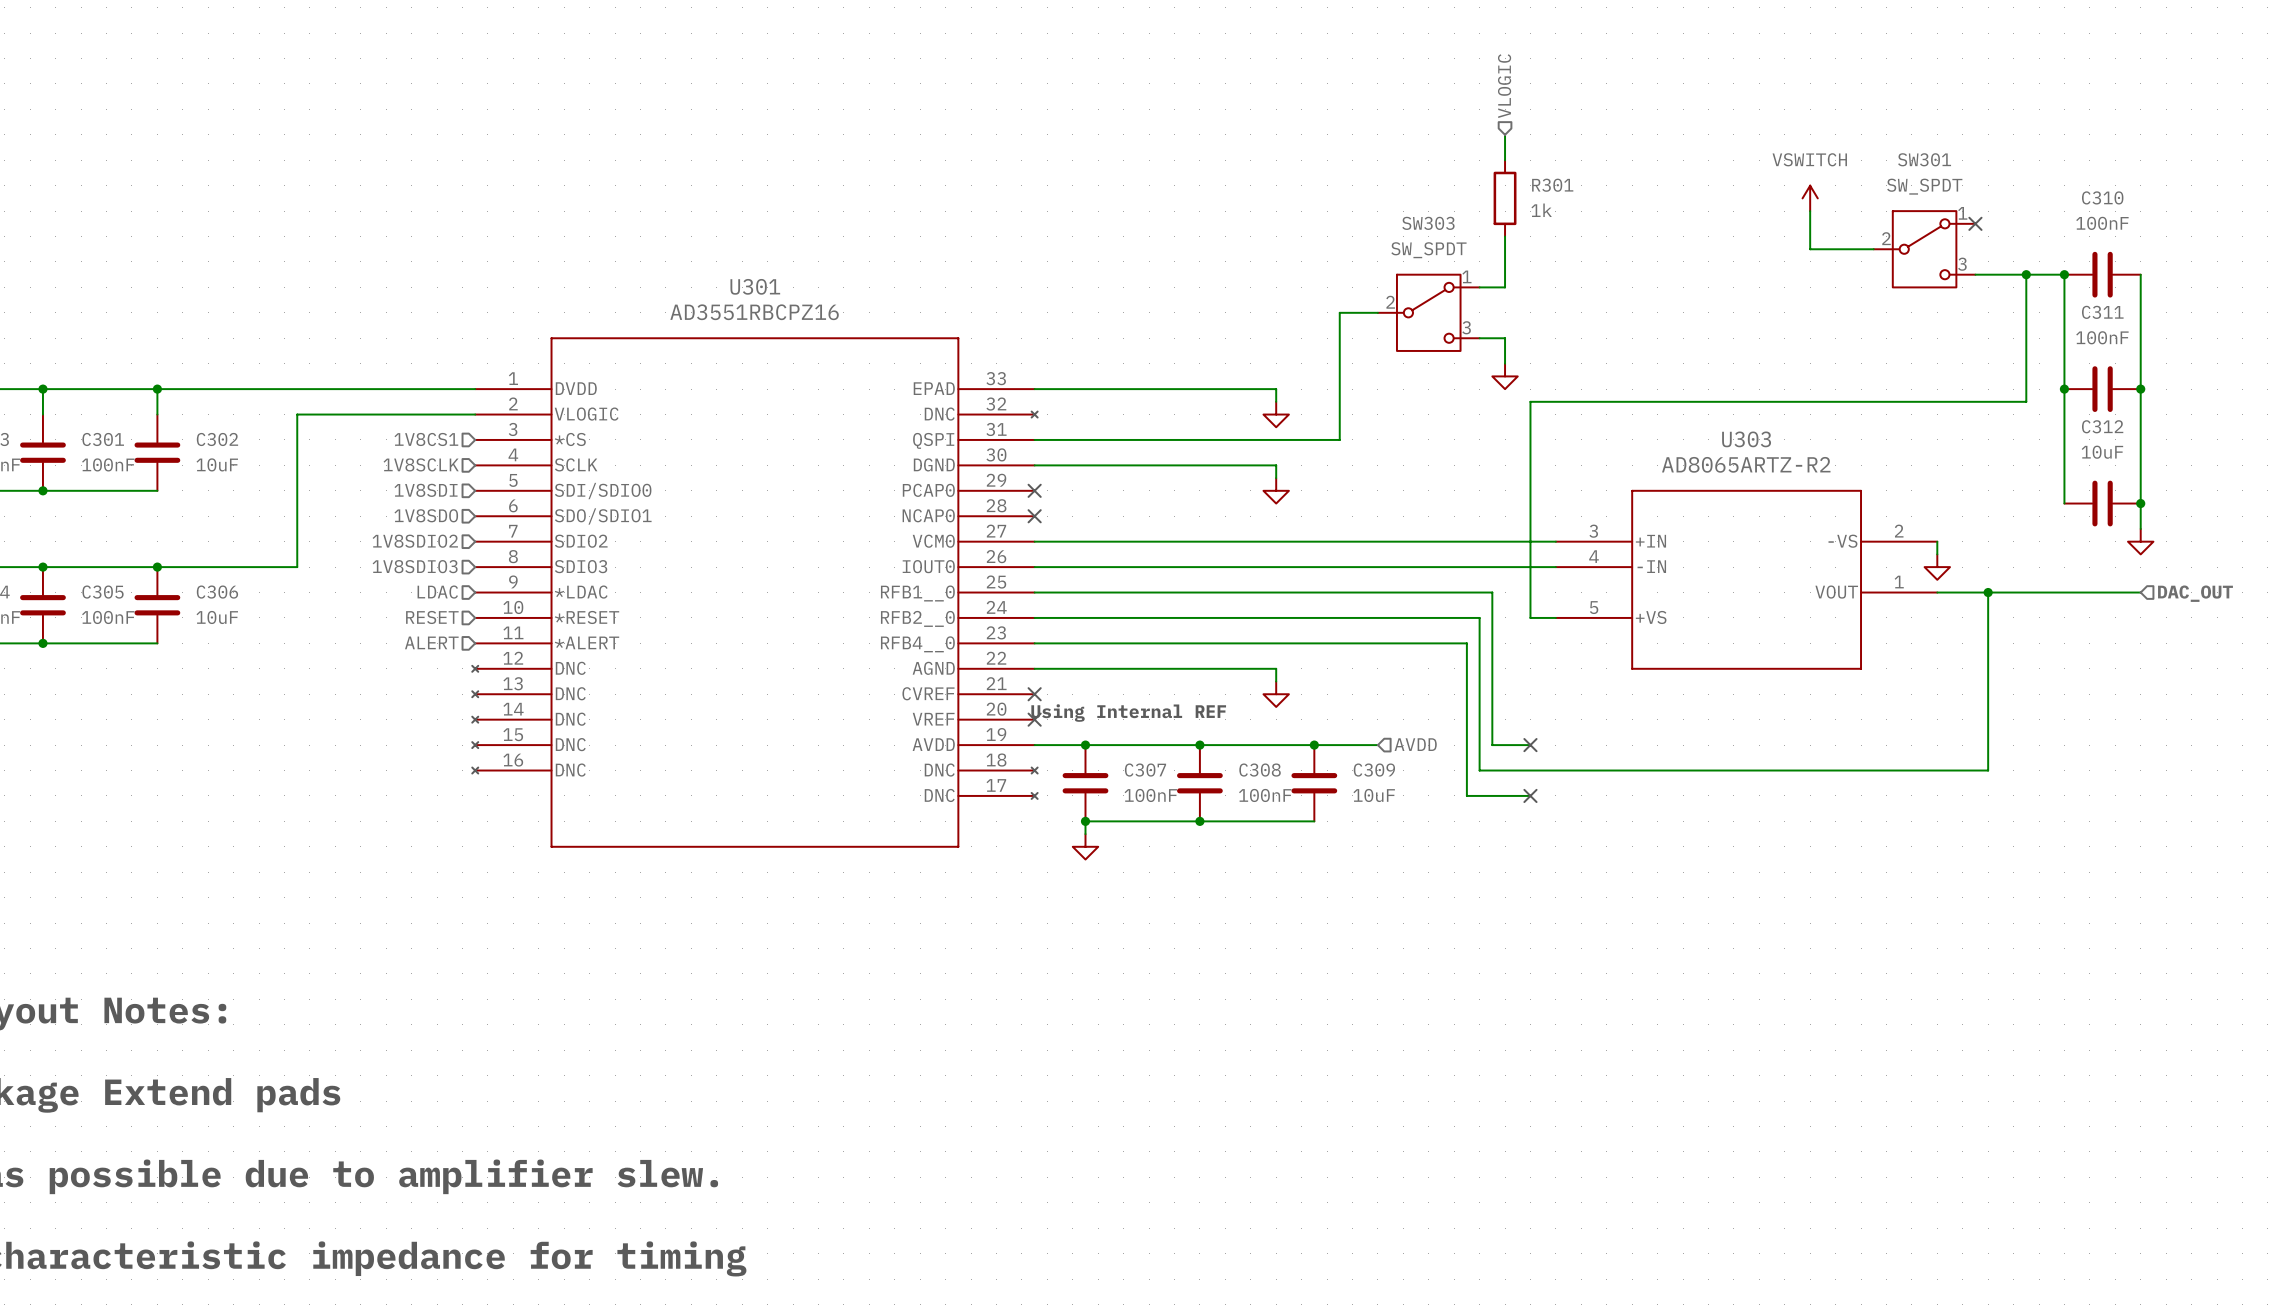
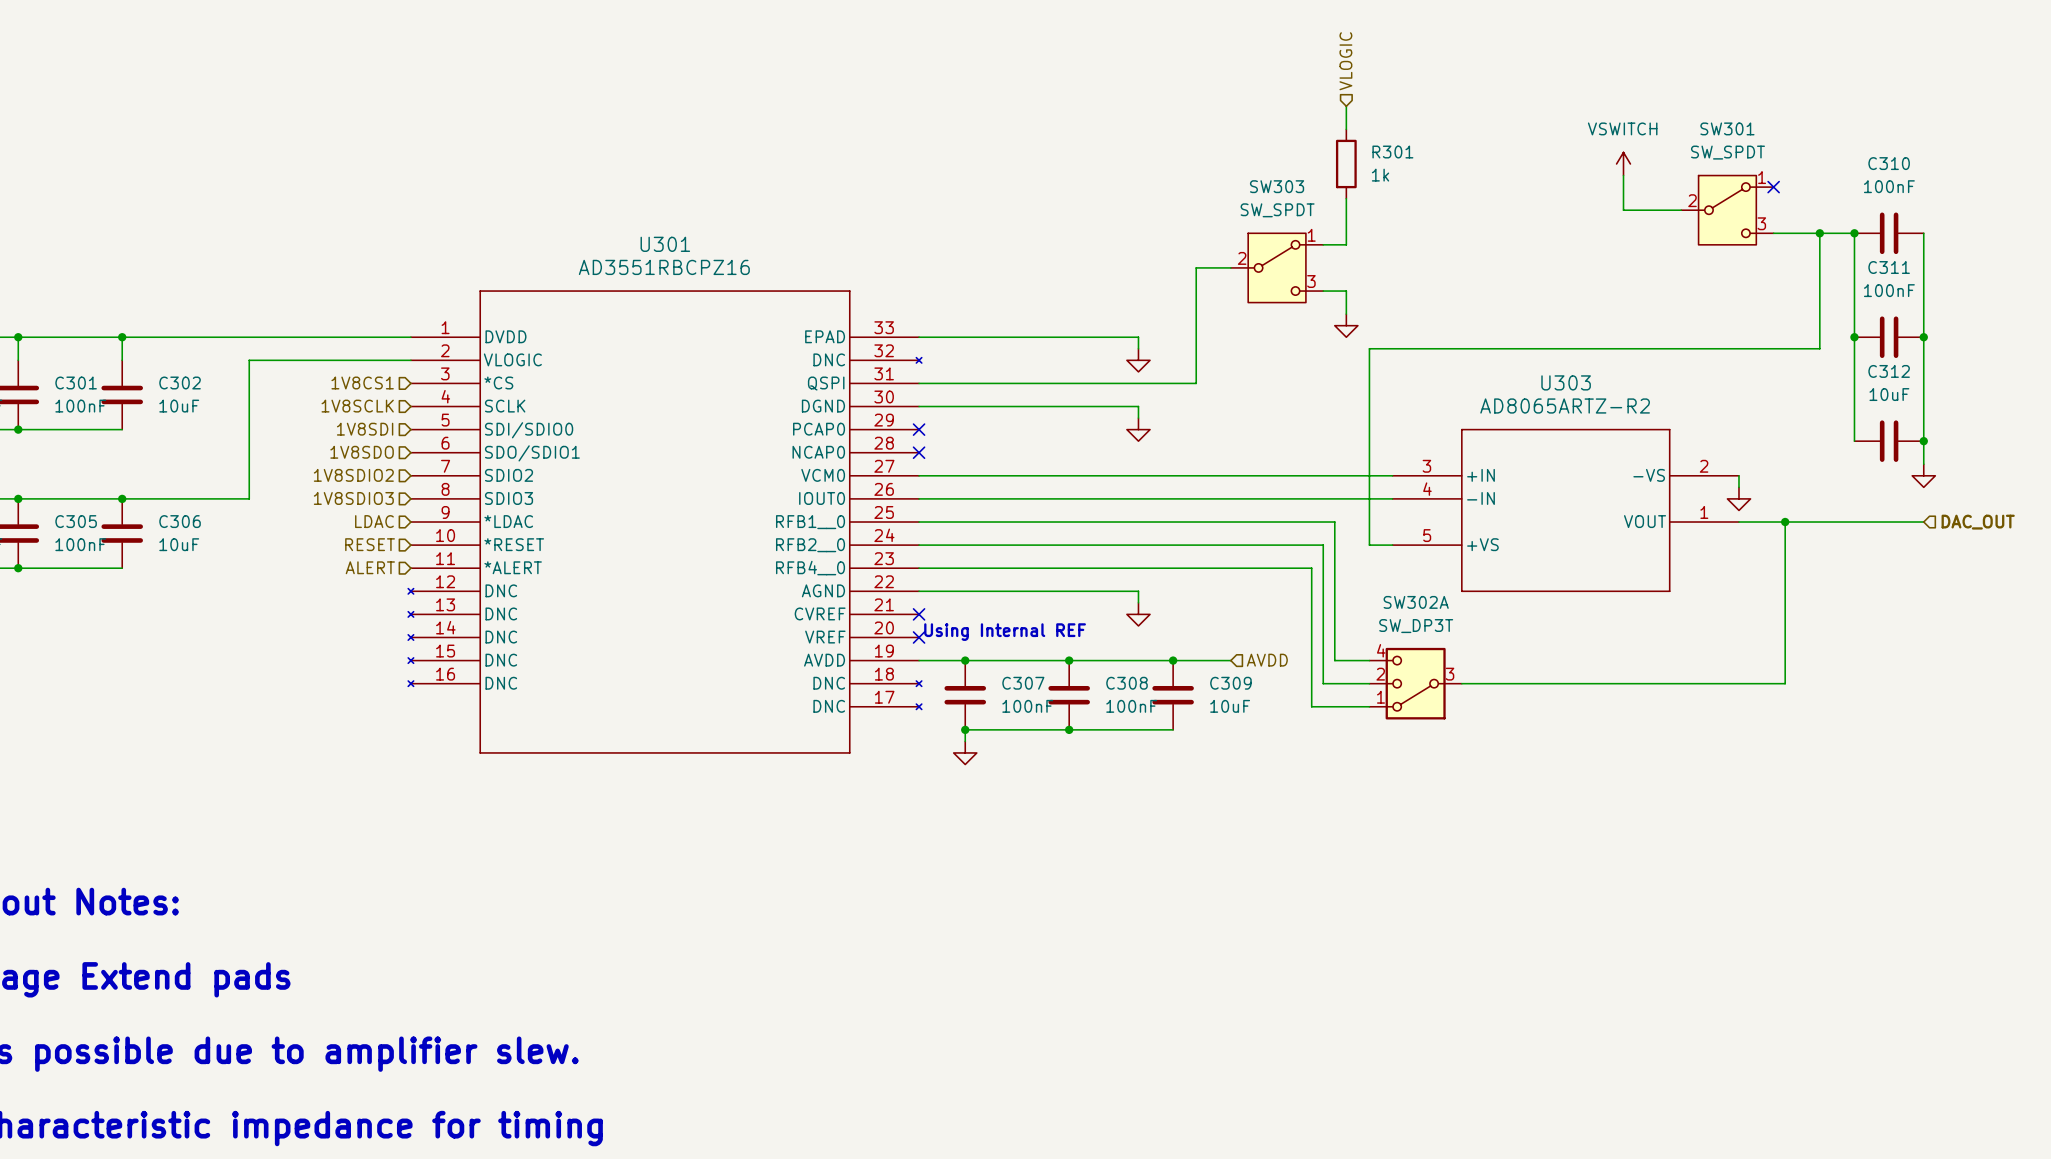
no-connect mark: (1530, 745) -> none
SW302A: none -> SW_DP3T (1415, 683)
no-connect mark: (1530, 795) -> none

